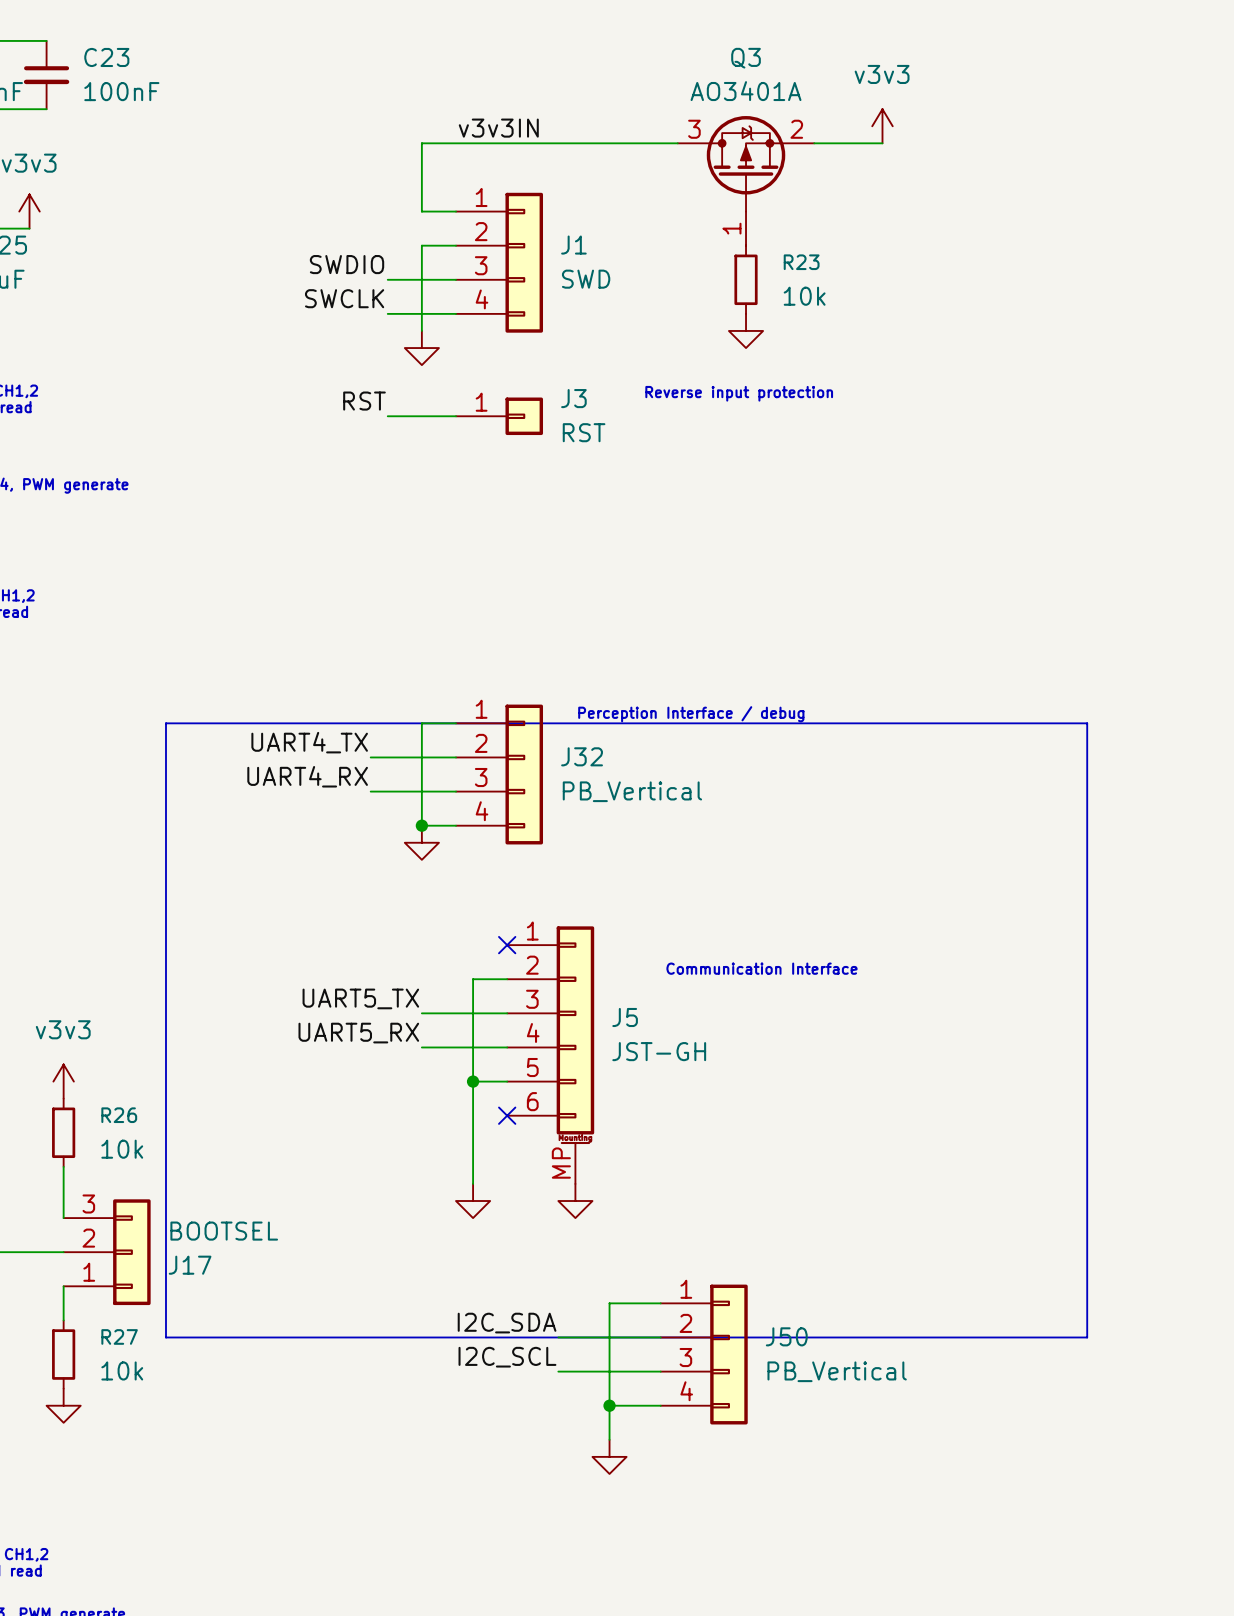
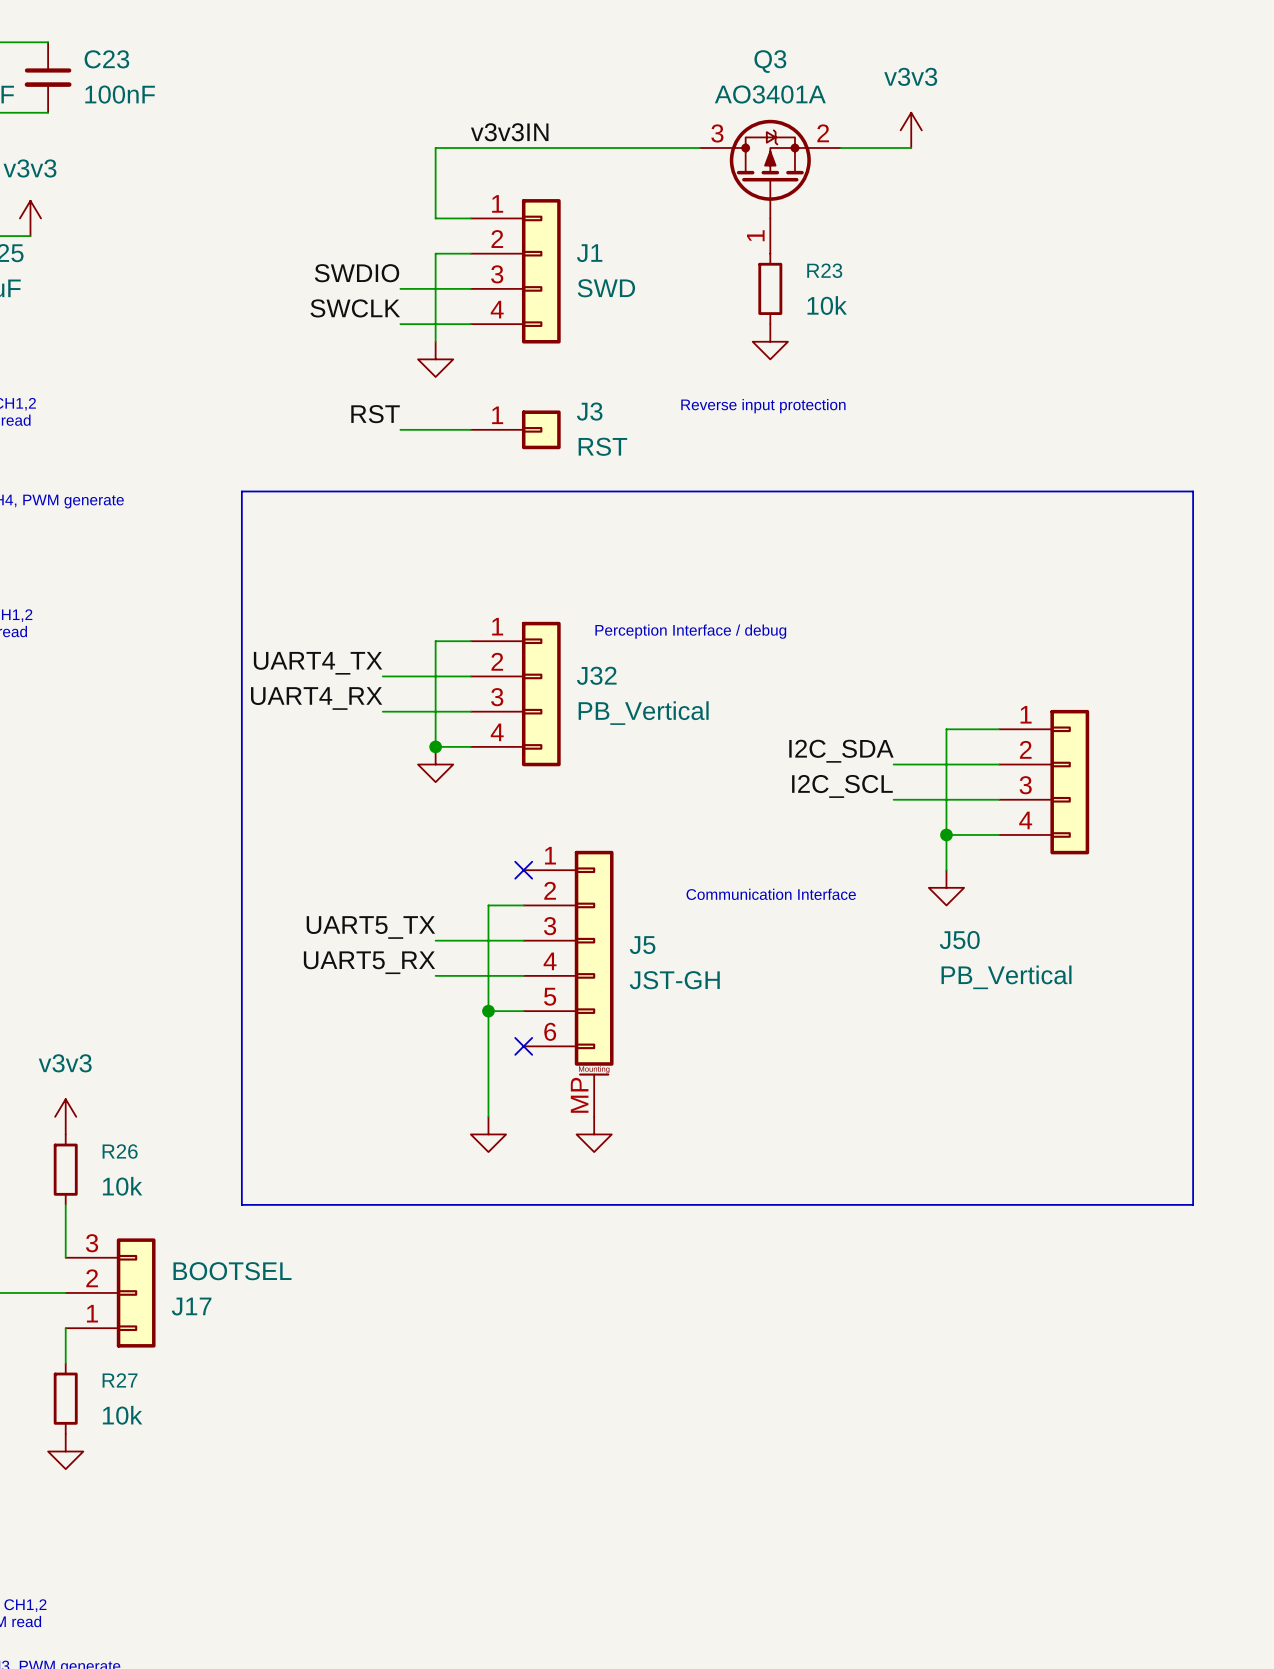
line: none -> (241, 491) (1193, 491) (1193, 1204) (241, 1204) (241, 491)
wire: none -> (999, 729) (946, 729) (946, 870)
text position: Perception Interface / debug (691, 714) -> Perception Interface / debug (690, 631)
line: (165, 723) (1087, 723) (1087, 1337) (165, 1337) (165, 723) -> none
wire: (421, 723) (421, 825) (456, 825) -> (435, 746) (435, 641) (470, 641)
junction: none -> (435, 746)
label: none -> I2C_SDA (841, 751)
wire: none -> (893, 764) (999, 764)
label position: UART4_TX (309, 742) -> UART4_TX (318, 663)
wire: (370, 757) (456, 757) -> (382, 676) (470, 676)
label: none -> I2C_SCL (842, 786)
J32 position: (499, 774) -> (515, 694)
wire: none -> (893, 799) (999, 799)
label position: UART4_RX (307, 776) -> UART4_RX (316, 698)
wire: (370, 791) (456, 791) -> (382, 711) (470, 711)
wire: none -> (946, 834) (999, 834)
junction: none -> (946, 834)
junction: (421, 825) -> none
power symbol position: (421, 842) -> (435, 764)
no-connect mark: none -> (523, 870)
power symbol: none -> (946, 887)
no-connect mark: (507, 945) -> none
text position: Communication Interface (761, 968) -> Communication Interface (771, 894)
junction: none -> (488, 1011)
label position: UART5_TX (360, 998) -> UART5_TX (370, 927)
wire: (421, 1013) (507, 1013) -> (435, 940) (523, 940)
no-connect mark: none -> (523, 1046)
label position: UART5_RX (358, 1033) -> UART5_RX (369, 962)
wire: (421, 1047) (507, 1047) -> (435, 975) (523, 975)
J5 position: (550, 1055) -> (568, 983)
junction: (473, 1081) -> none
wire: (507, 1081) (473, 1081) (473, 1183) -> (523, 905) (488, 905) (488, 1011)
power symbol: none -> (488, 1134)
power symbol: none -> (594, 1134)
no-connect mark: (507, 1115) -> none
power symbol: (473, 1201) -> none
power symbol: (575, 1201) -> none
wire: (660, 1303) (609, 1303) (609, 1439) -> none
label: I2C_SDA (507, 1323) -> none
J50 name position: J50 (786, 1336) -> J50 (959, 940)
wire: (558, 1337) (660, 1337) -> none
J50 position: (704, 1354) -> (1044, 782)
label: I2C_SCL (507, 1357) -> none
wire: (558, 1371) (660, 1371) -> none
J50 value position: PB_Vertical (837, 1371) -> PB_Vertical (1006, 977)
wire: (609, 1405) (660, 1405) -> none
junction: (609, 1405) -> none
power symbol: (609, 1456) -> none

